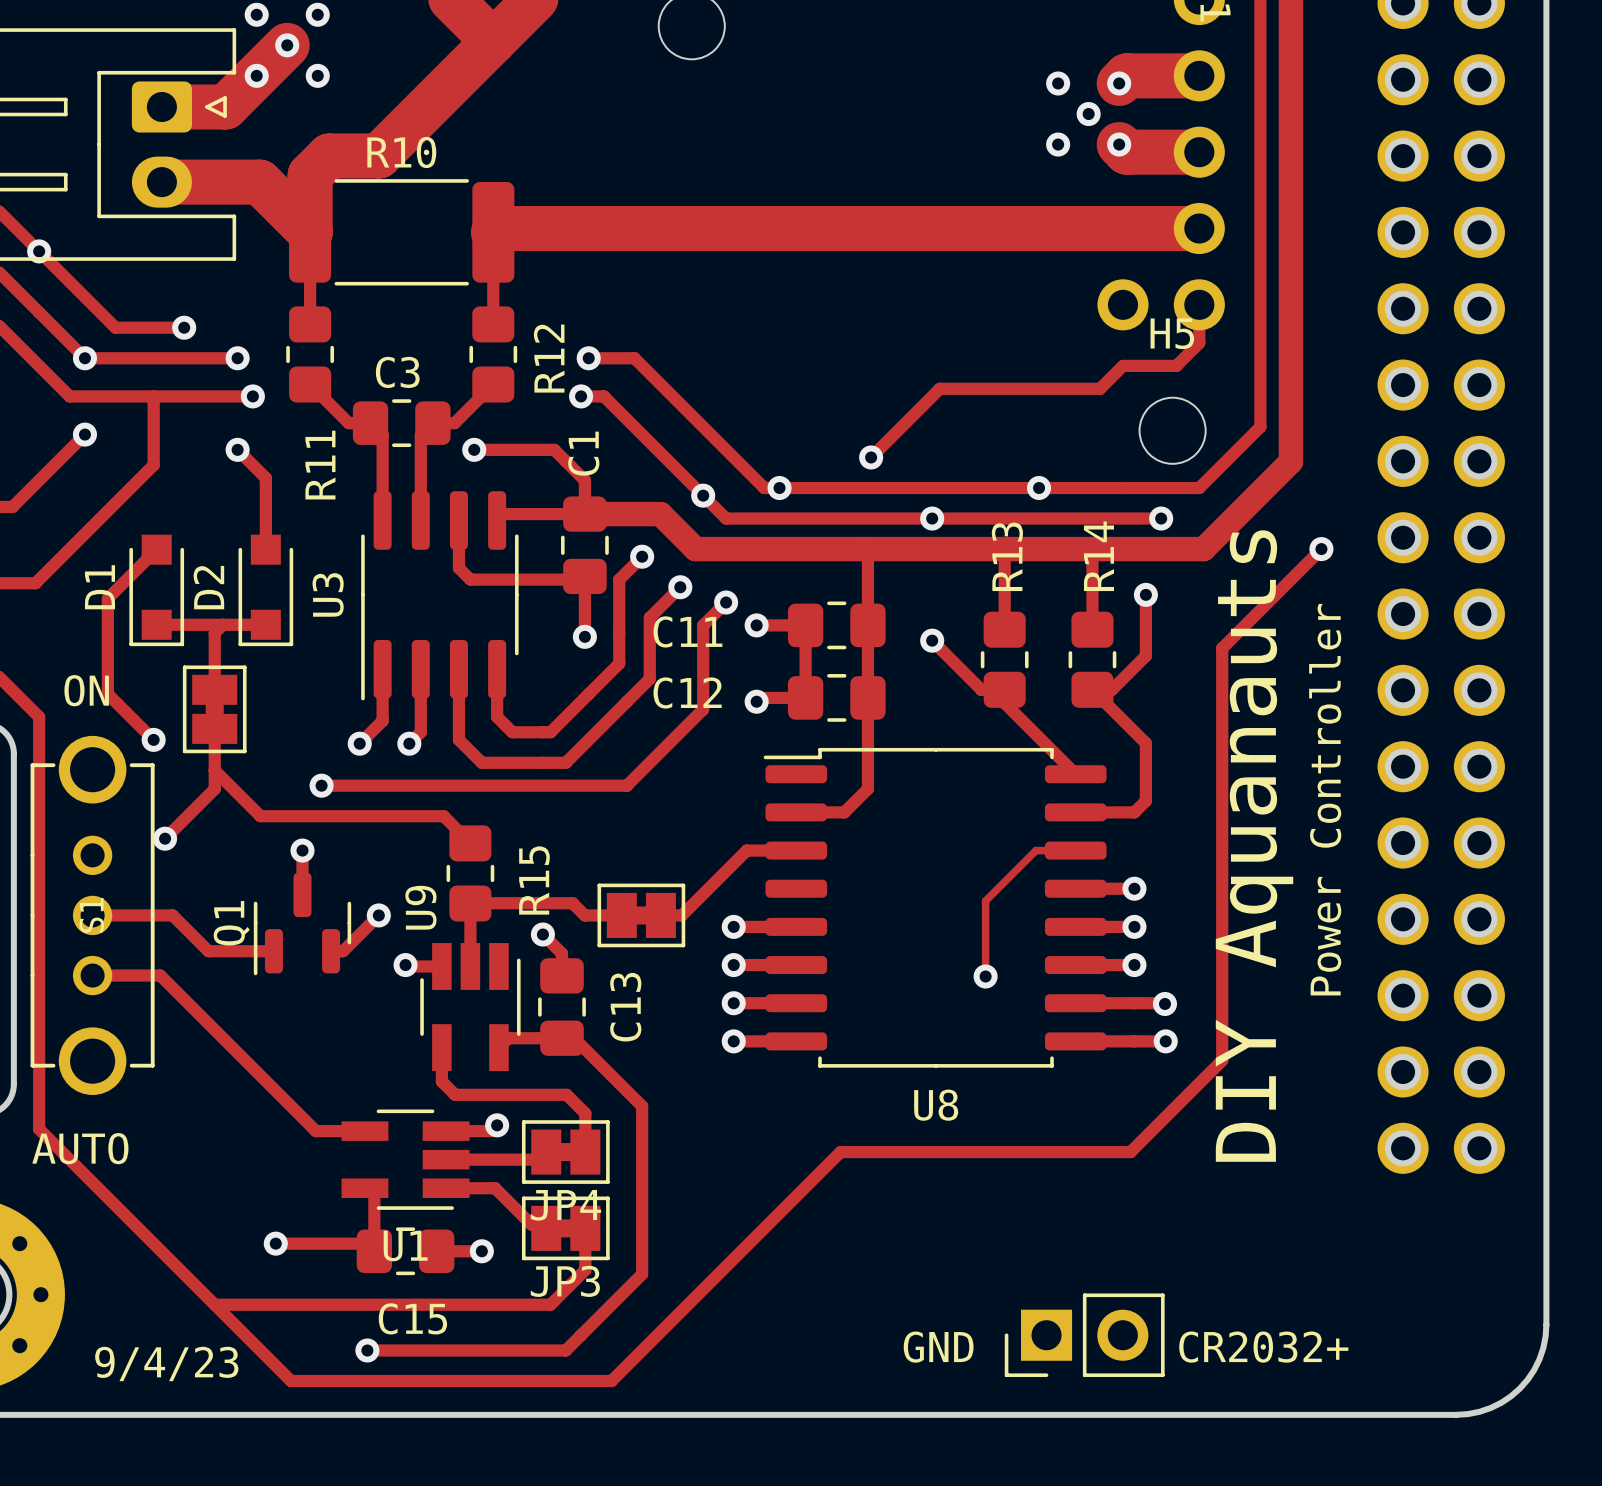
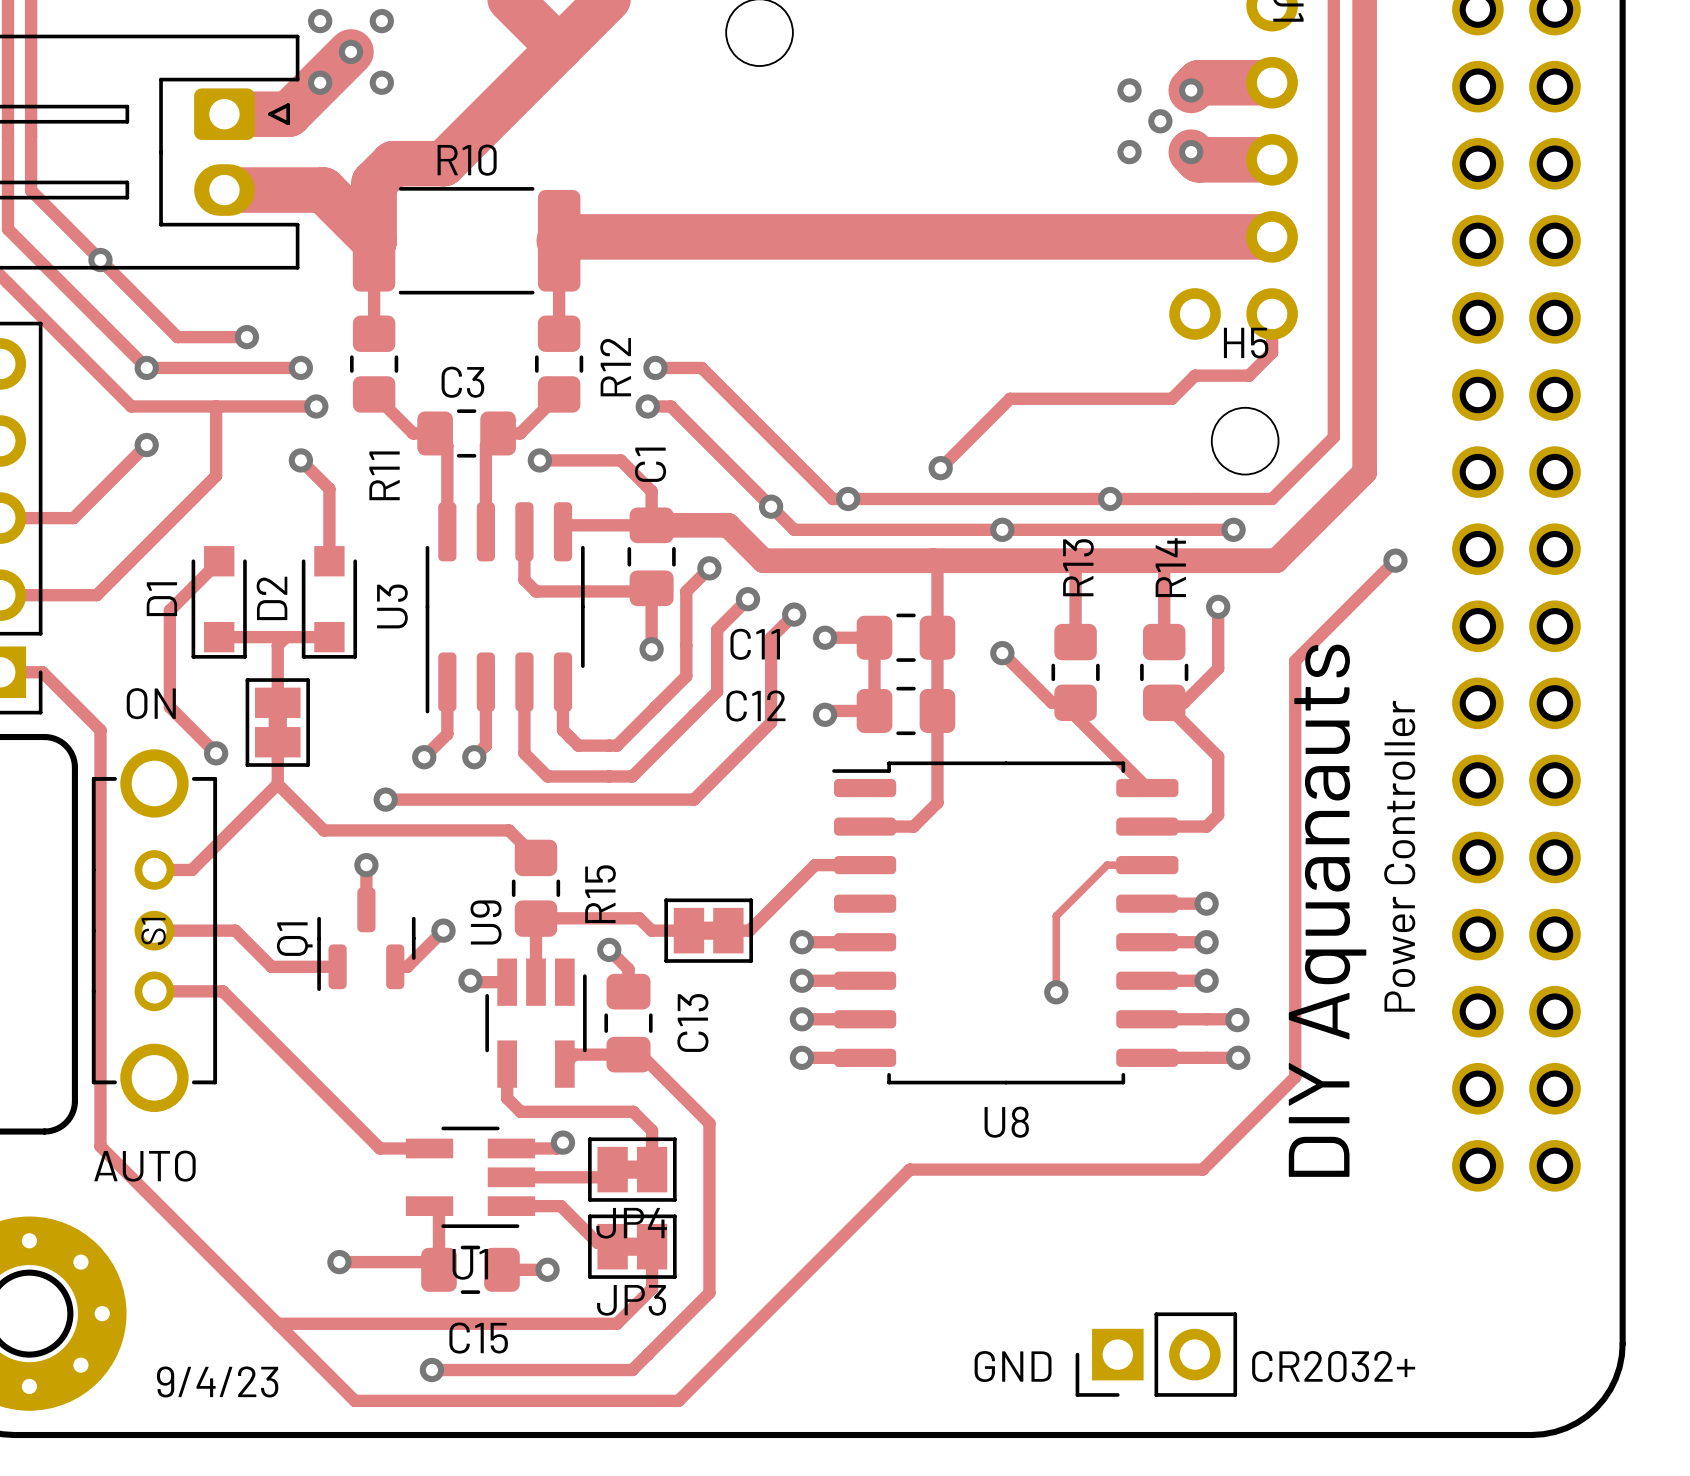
track: (214, 770) (214, 789) (165, 838) -> (277, 784) (192, 869) (154, 869)
via: (165, 838) -> none

